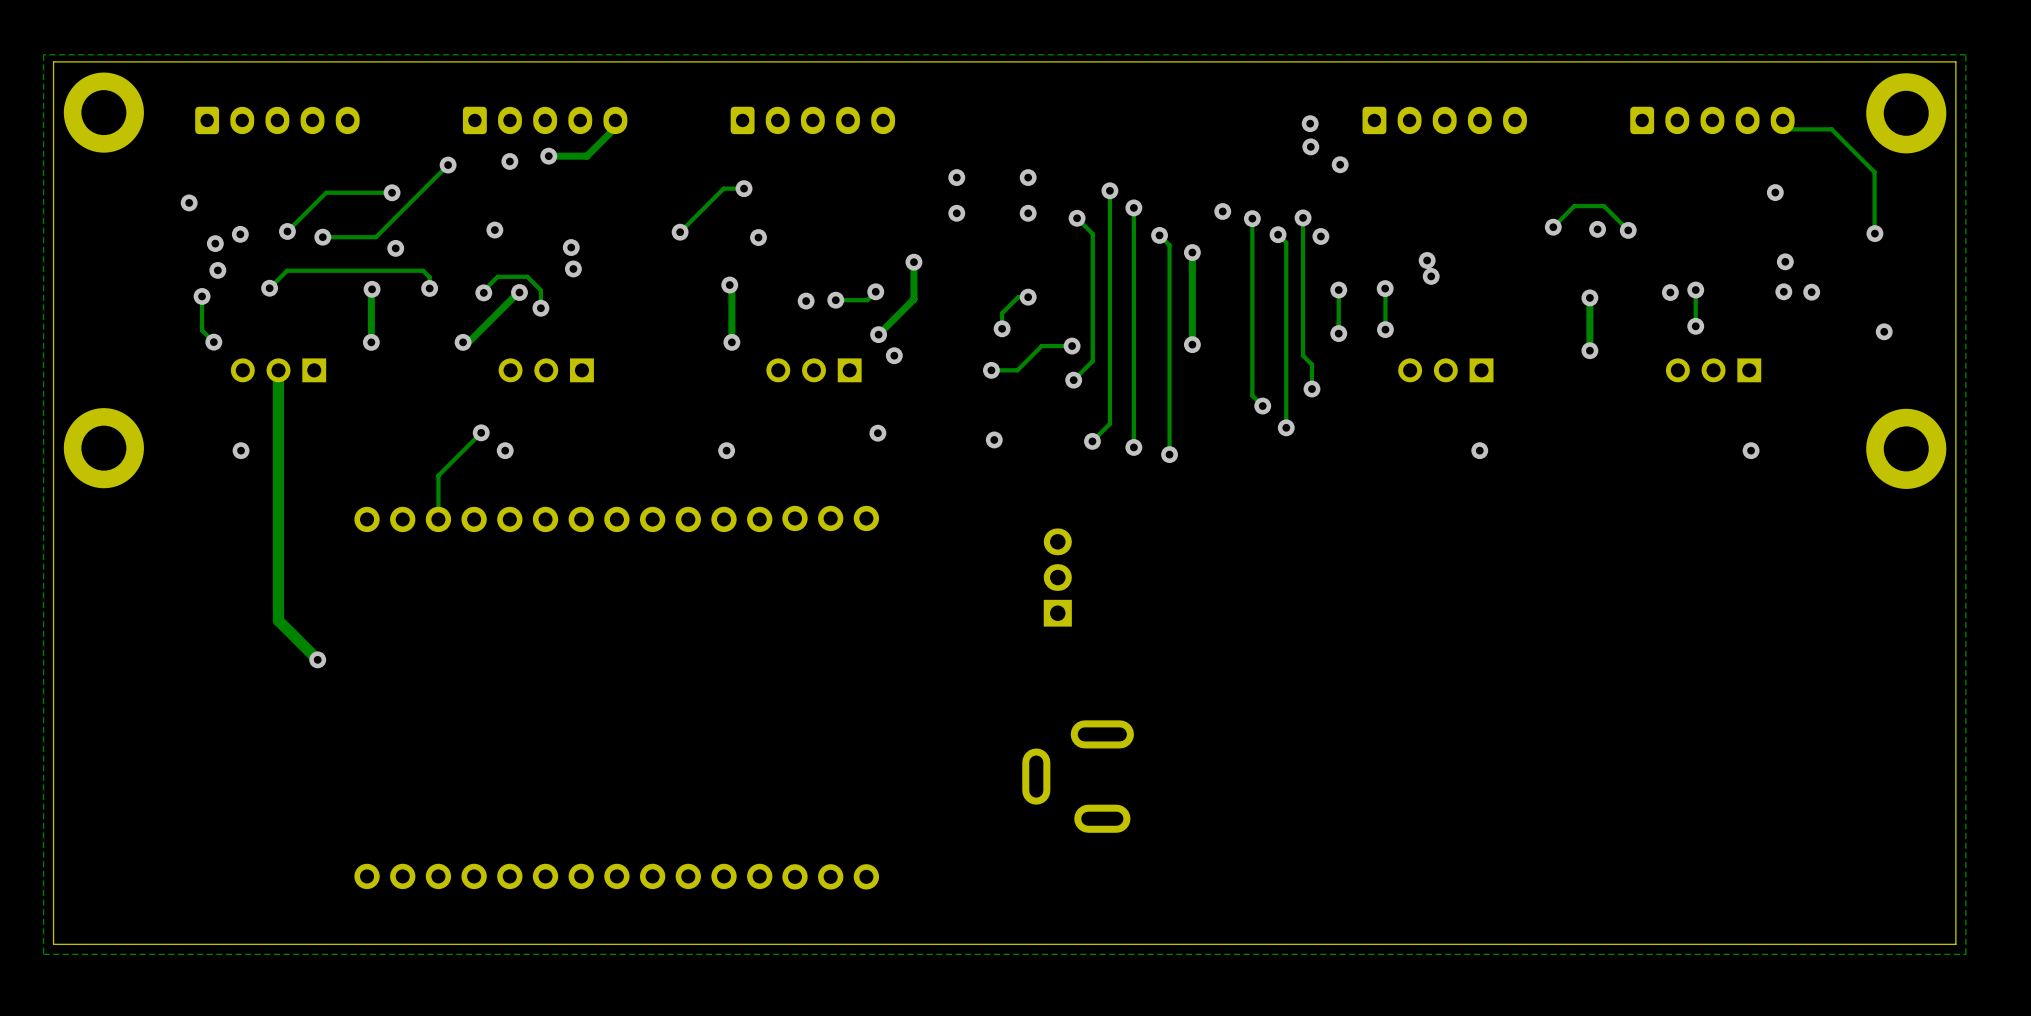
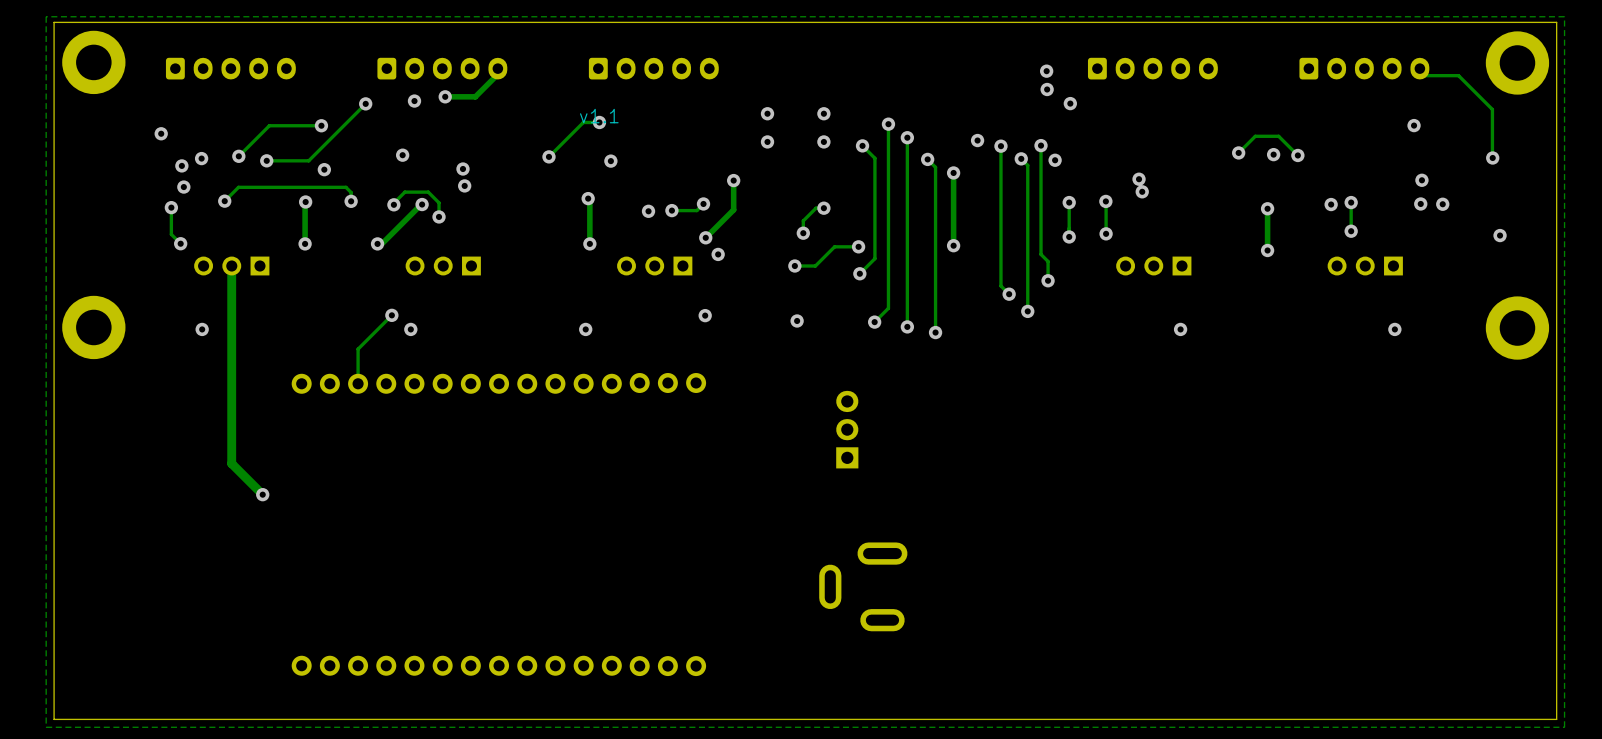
text: none -> v1.1 (599, 116)

